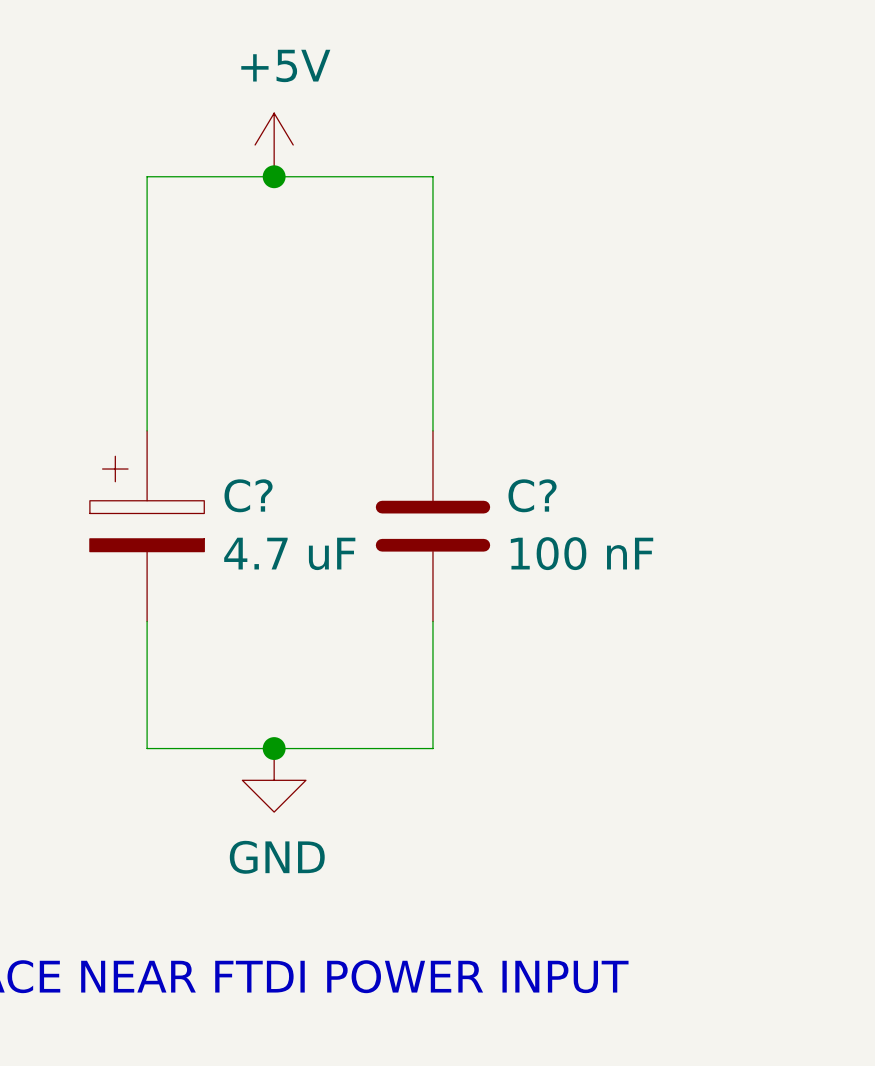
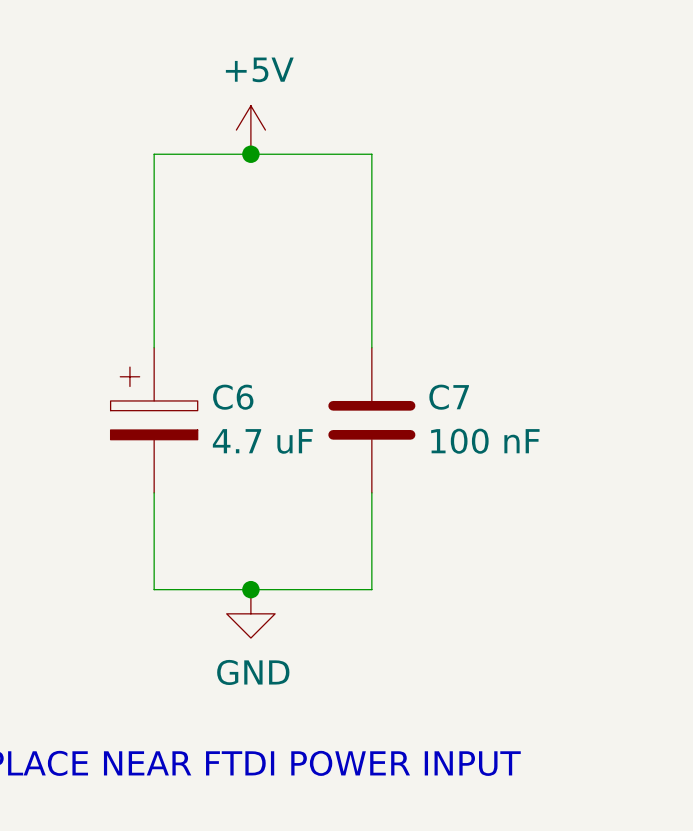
C? name: C? (248, 495) -> C6 (233, 397)
C? name: C? (532, 495) -> C7 (449, 397)

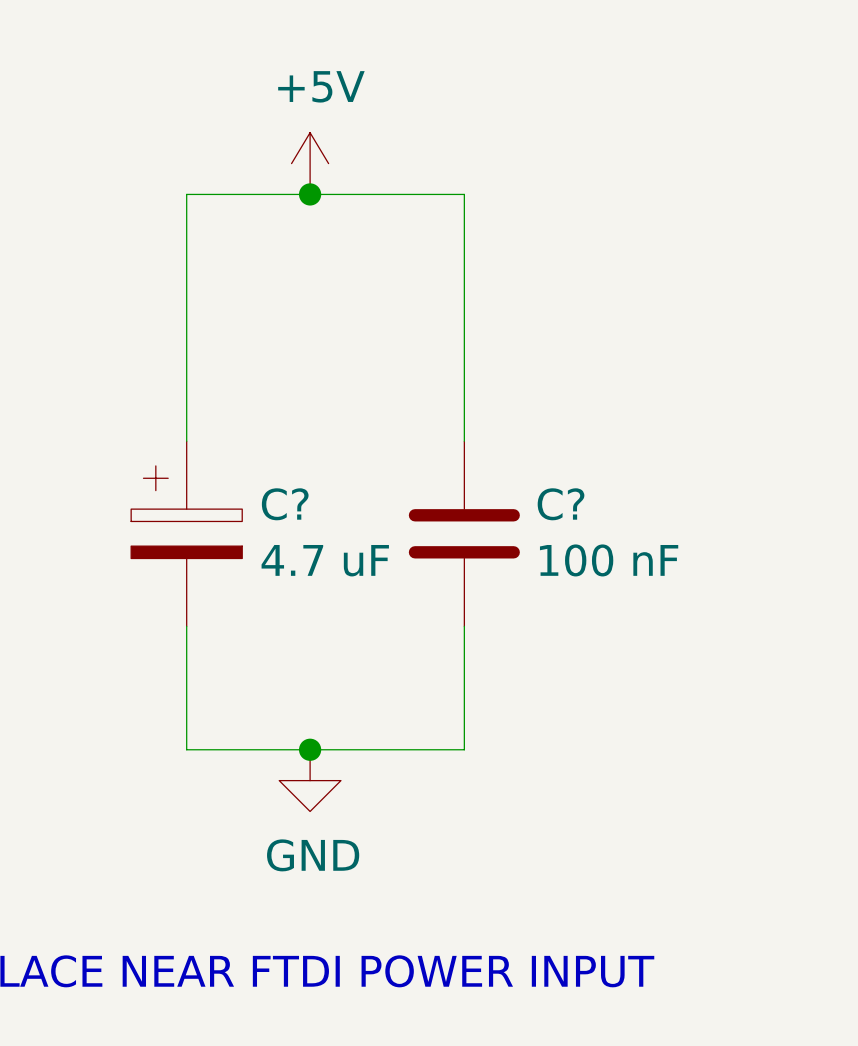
C6 name: C6 (233, 397) -> C? (285, 504)
C7 name: C7 (449, 397) -> C? (561, 504)

